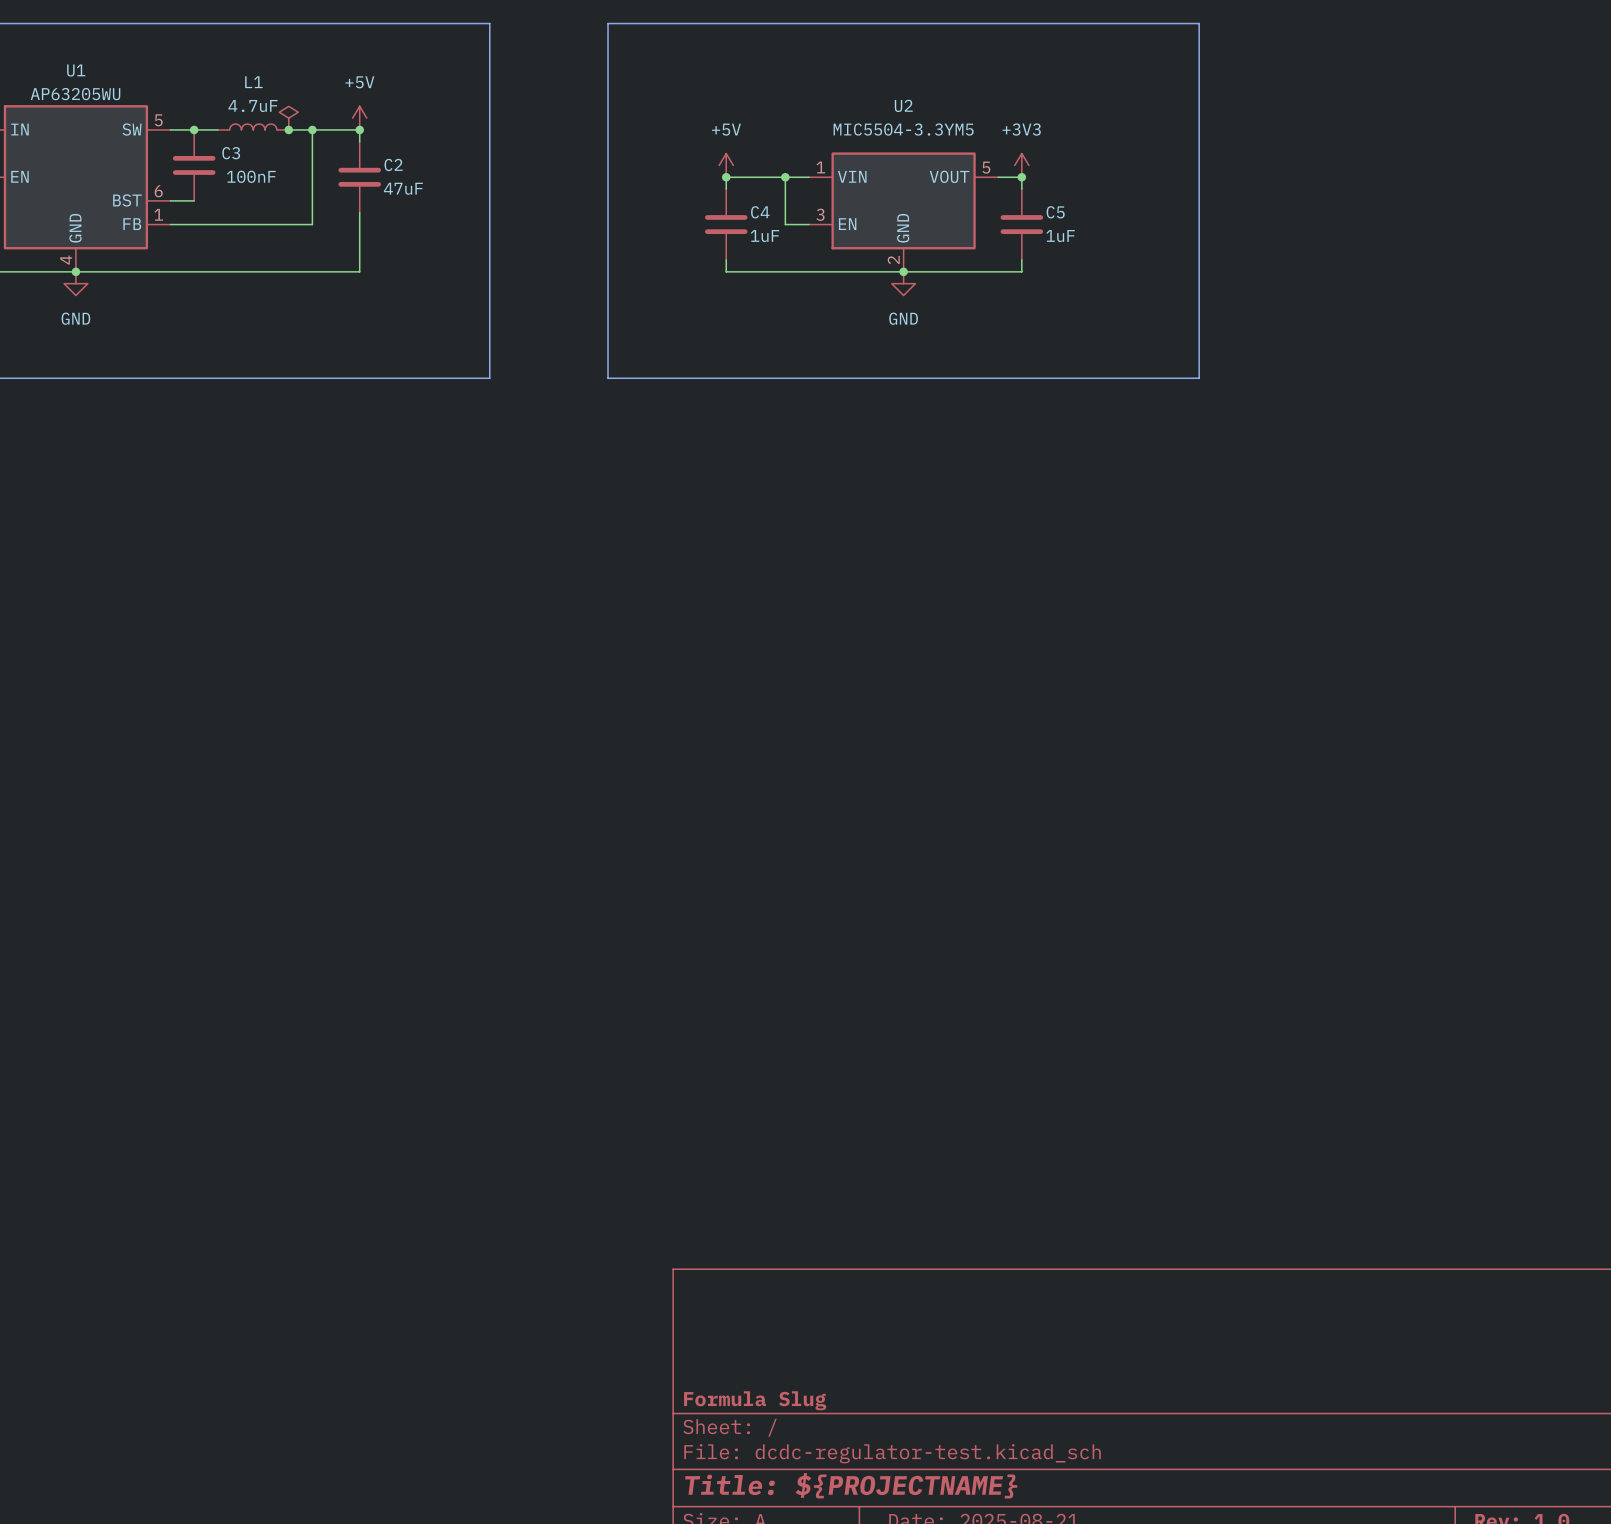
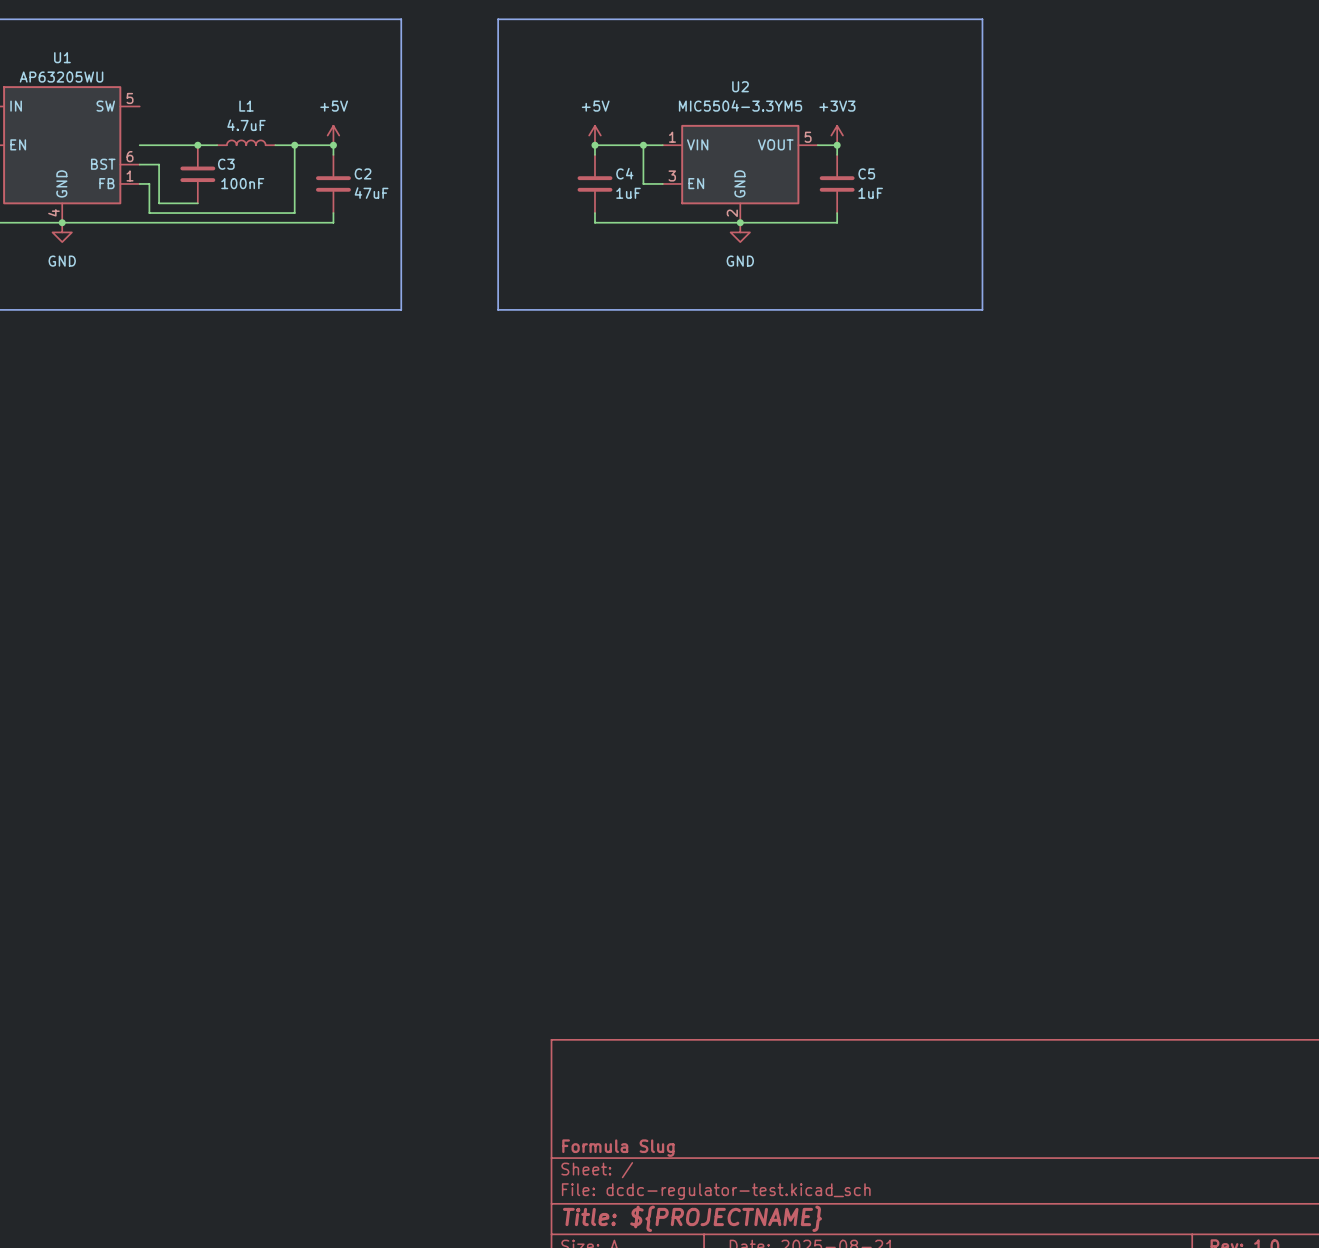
power symbol: (288, 118) -> none
power symbol position: +5V (359, 118) -> +5V (333, 135)
L1 position: (253, 127) -> (246, 142)
wire: (170, 129) (217, 129) -> none
junction: (194, 129) -> none
wire: (288, 129) (359, 129) (359, 141) -> (275, 145) (333, 145) (333, 154)
junction: (288, 129) -> none
wire: (312, 129) (312, 224) (182, 224) -> (294, 213) (149, 213) (149, 183)
junction: (312, 129) -> none
junction: (359, 129) -> none
C3 position: (194, 165) -> (197, 174)
wire: none -> (139, 145) (217, 145)
junction: none -> (197, 145)
junction: none -> (294, 145)
C2 position: (359, 177) -> (333, 183)
junction: none -> (333, 145)
wire: none -> (159, 164) (159, 203) (197, 203)
wire: (359, 260) (359, 271) -> (333, 213) (333, 222) (294, 222)

